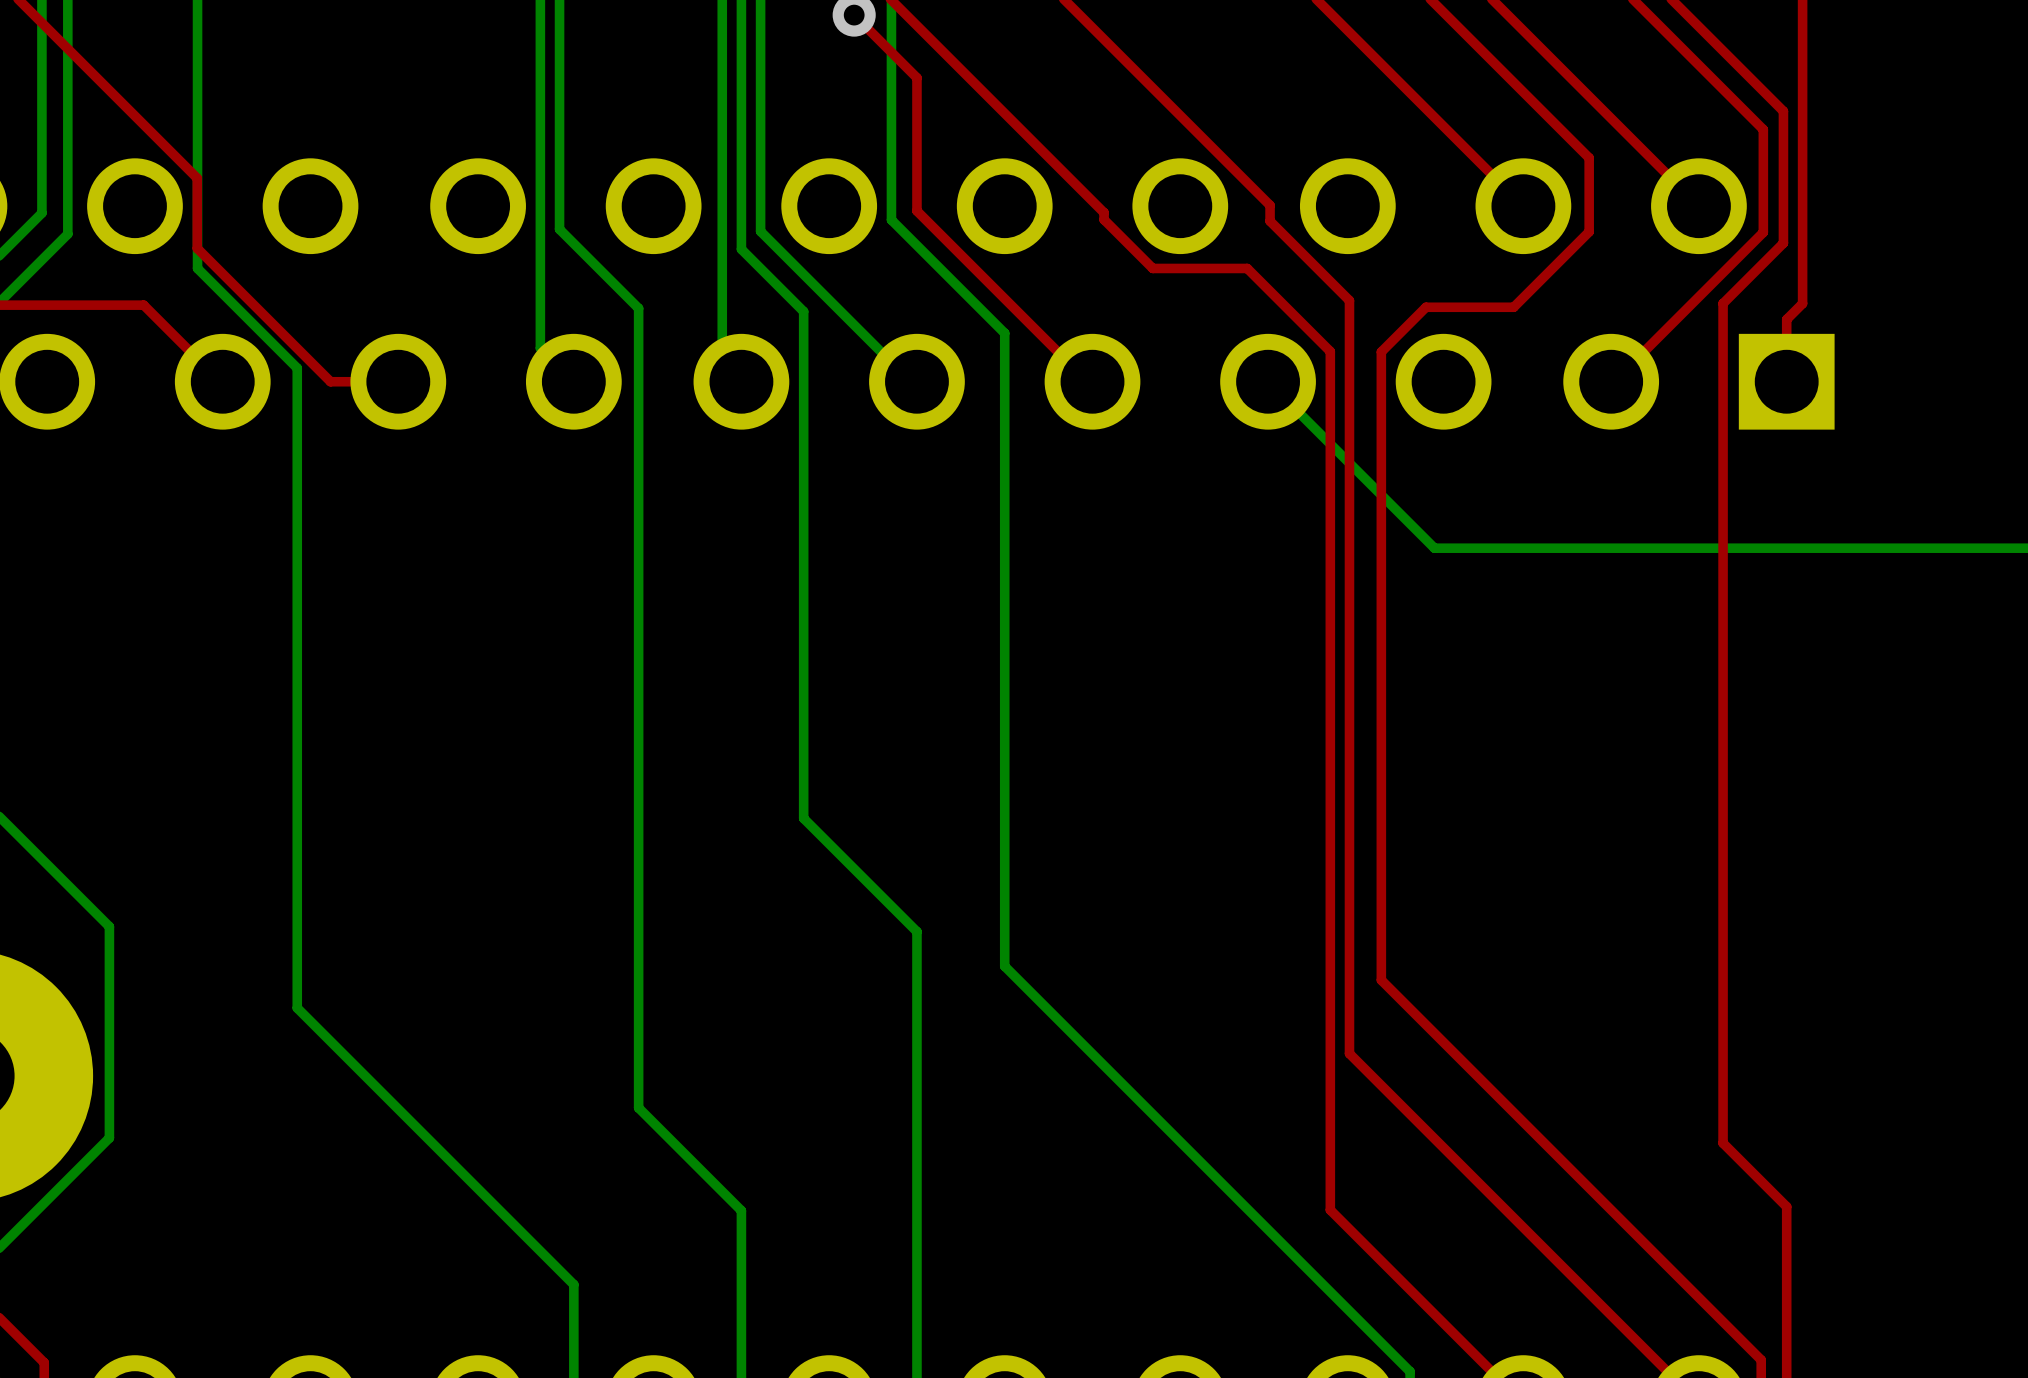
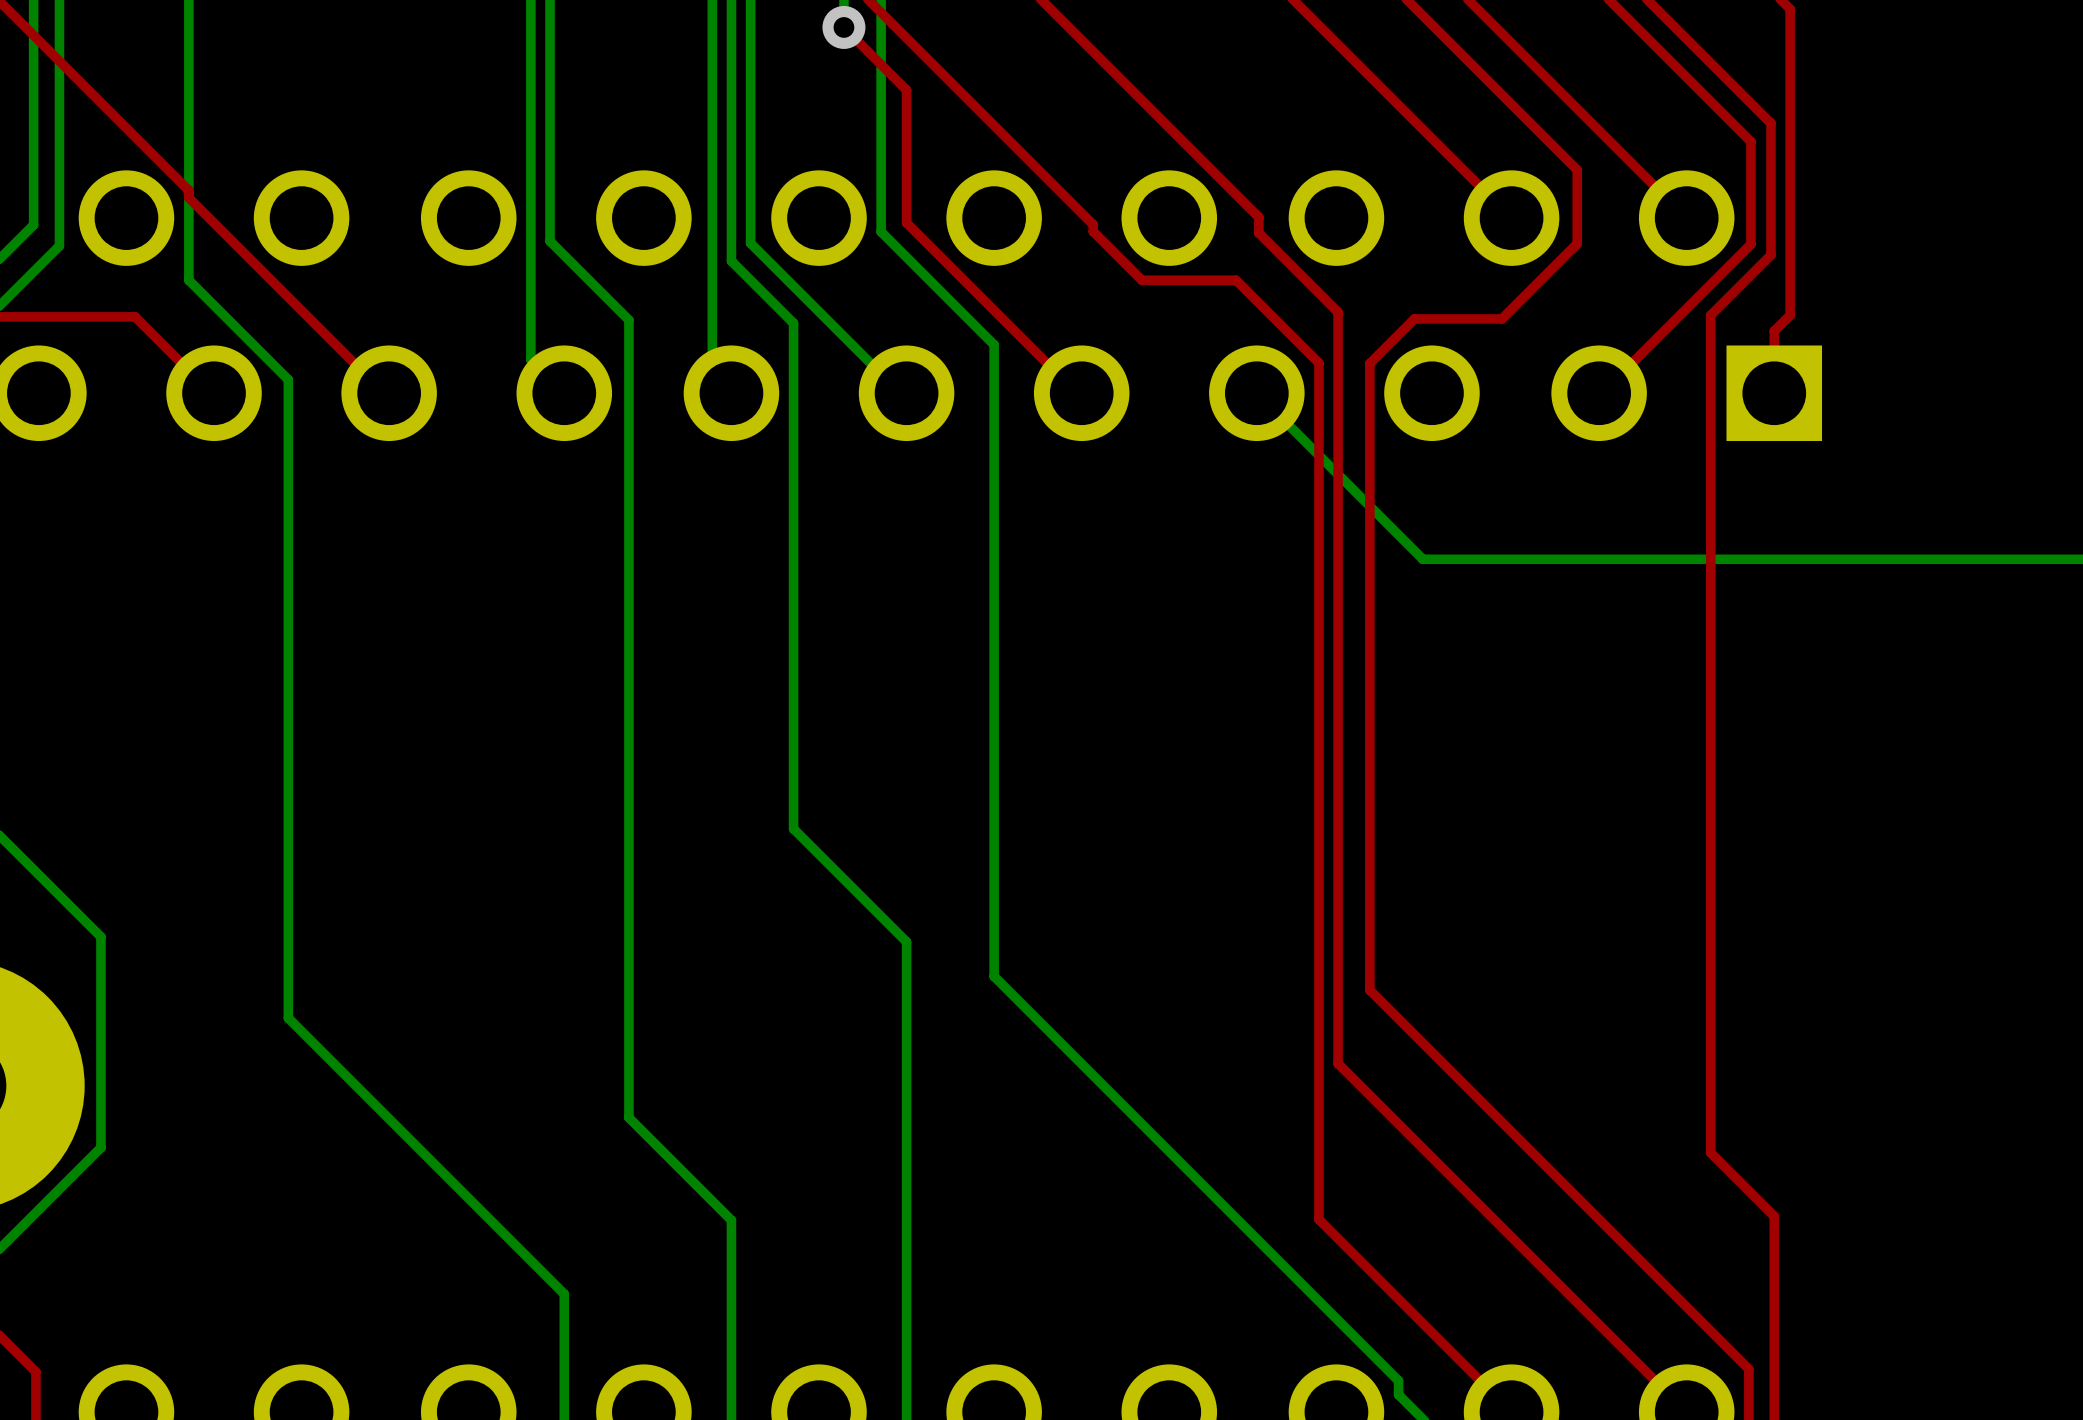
top track: (197, 185) (197, 248) (330, 381) (393, 381) -> (188, 197) (384, 393)

